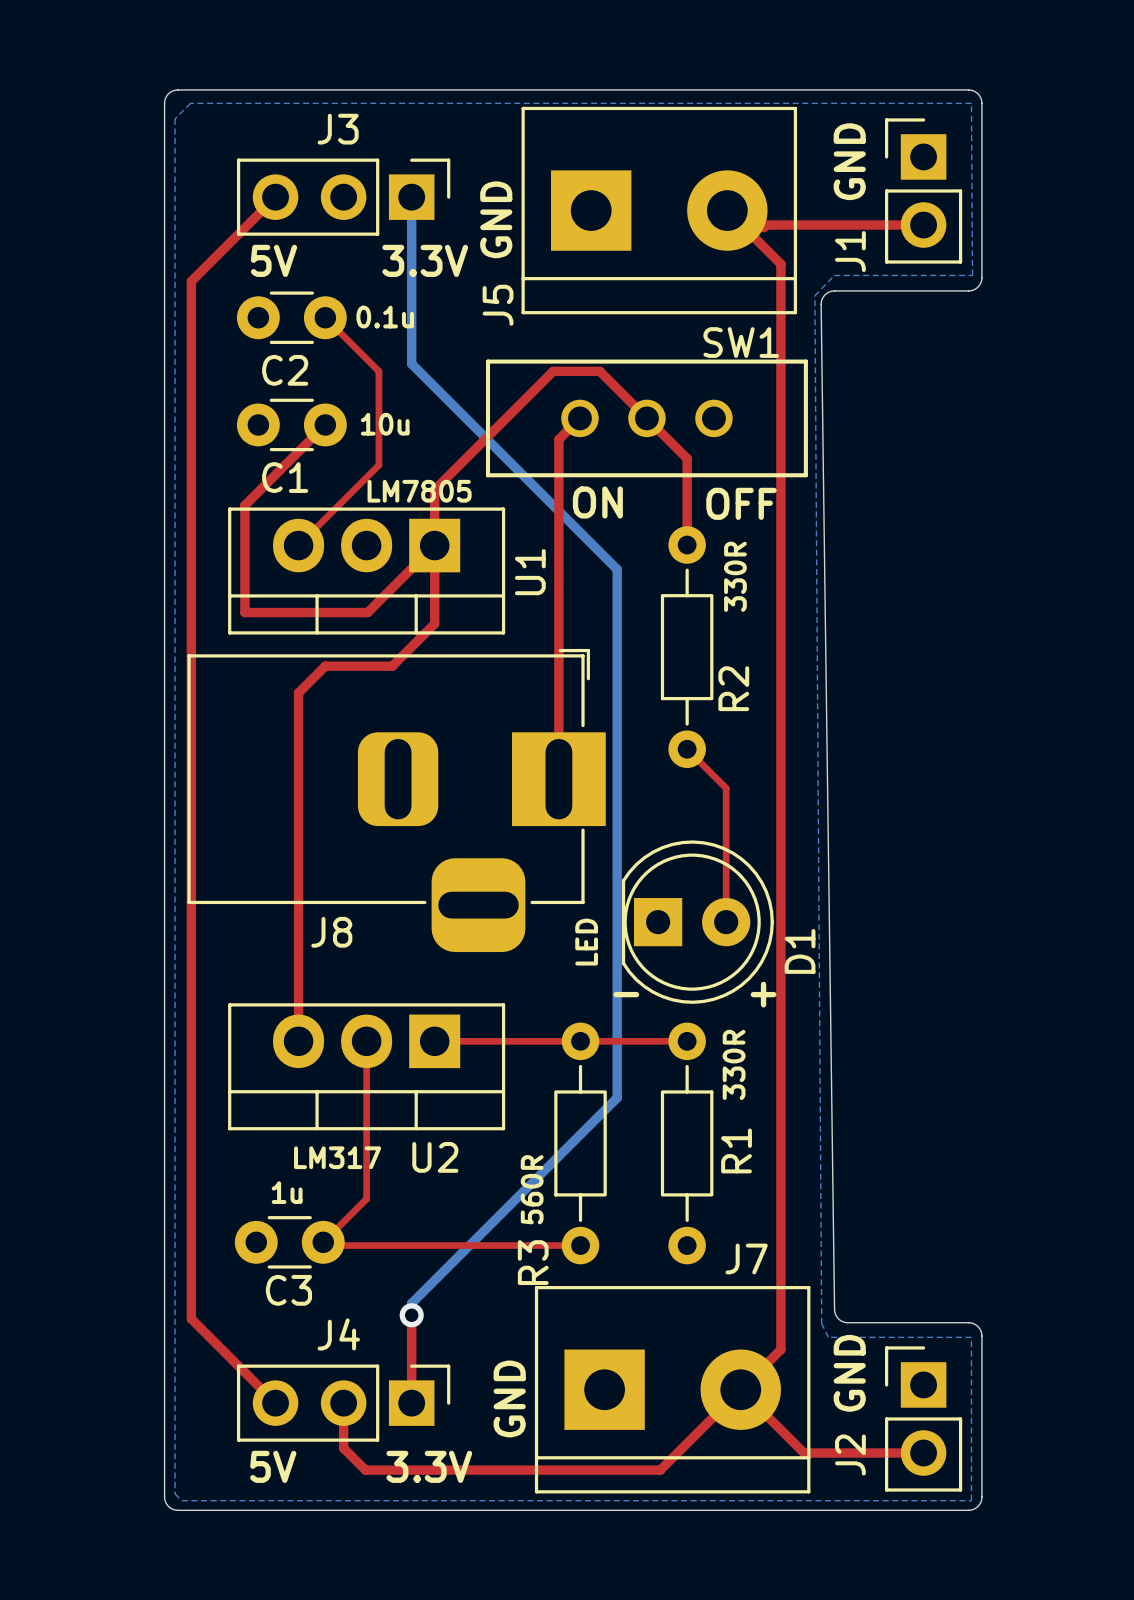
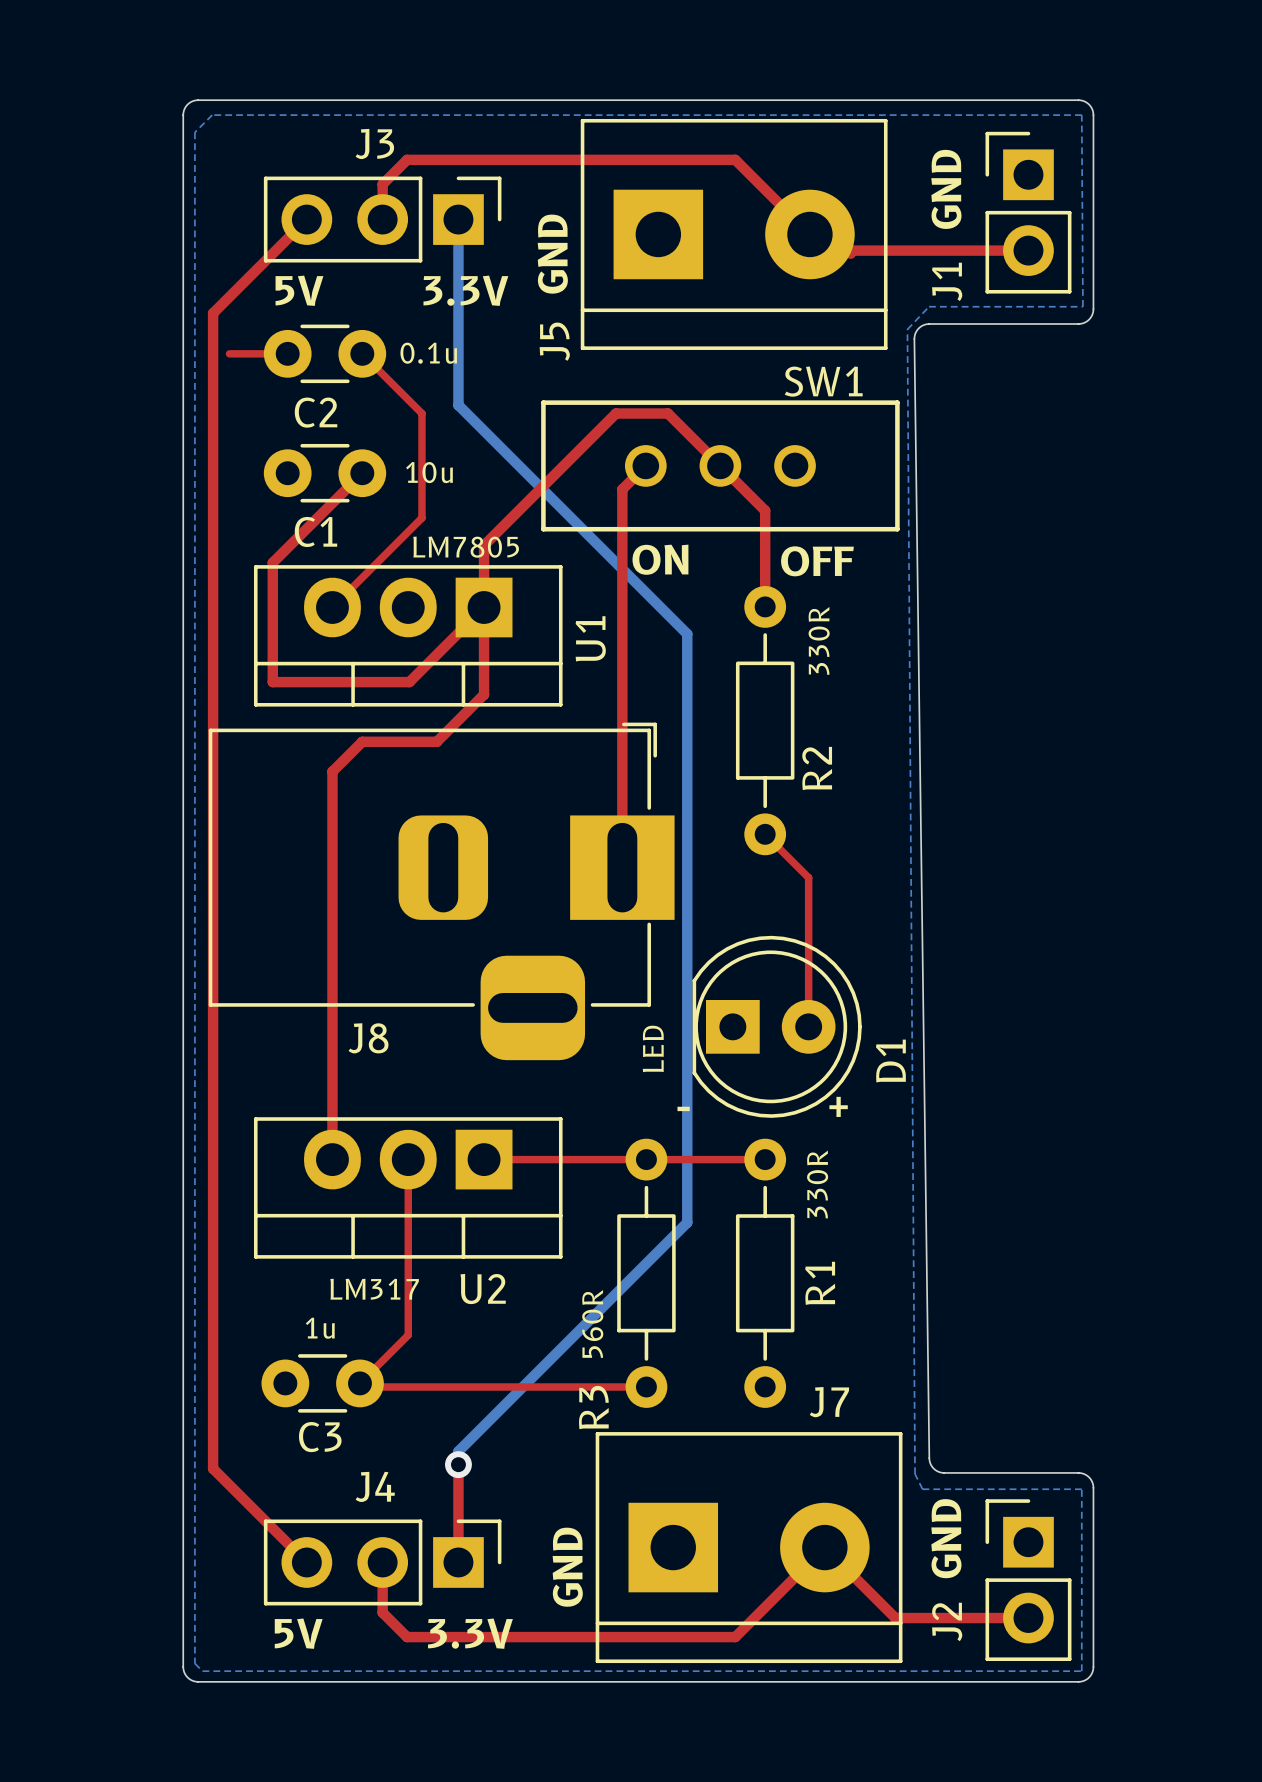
top track: none -> (382, 219) (382, 184) (407, 159) (735, 159) (809, 234)
top track: (741, 225) (780, 264) (780, 1349) (740, 1389) -> none
top track: none -> (229, 353) (287, 353)

